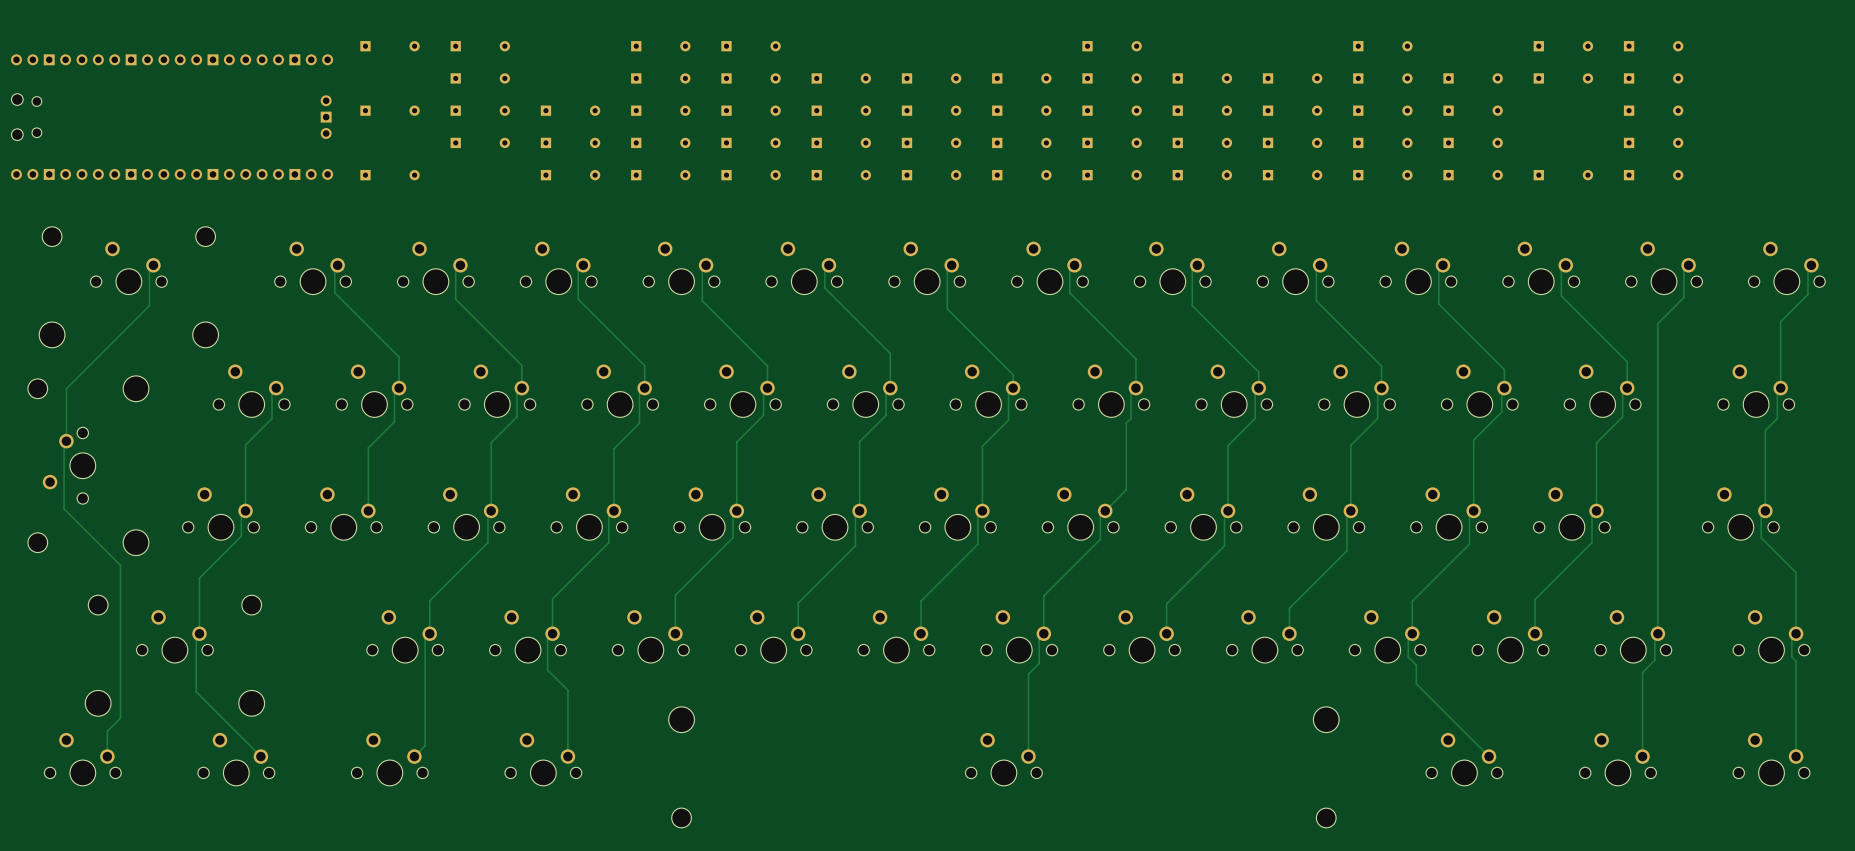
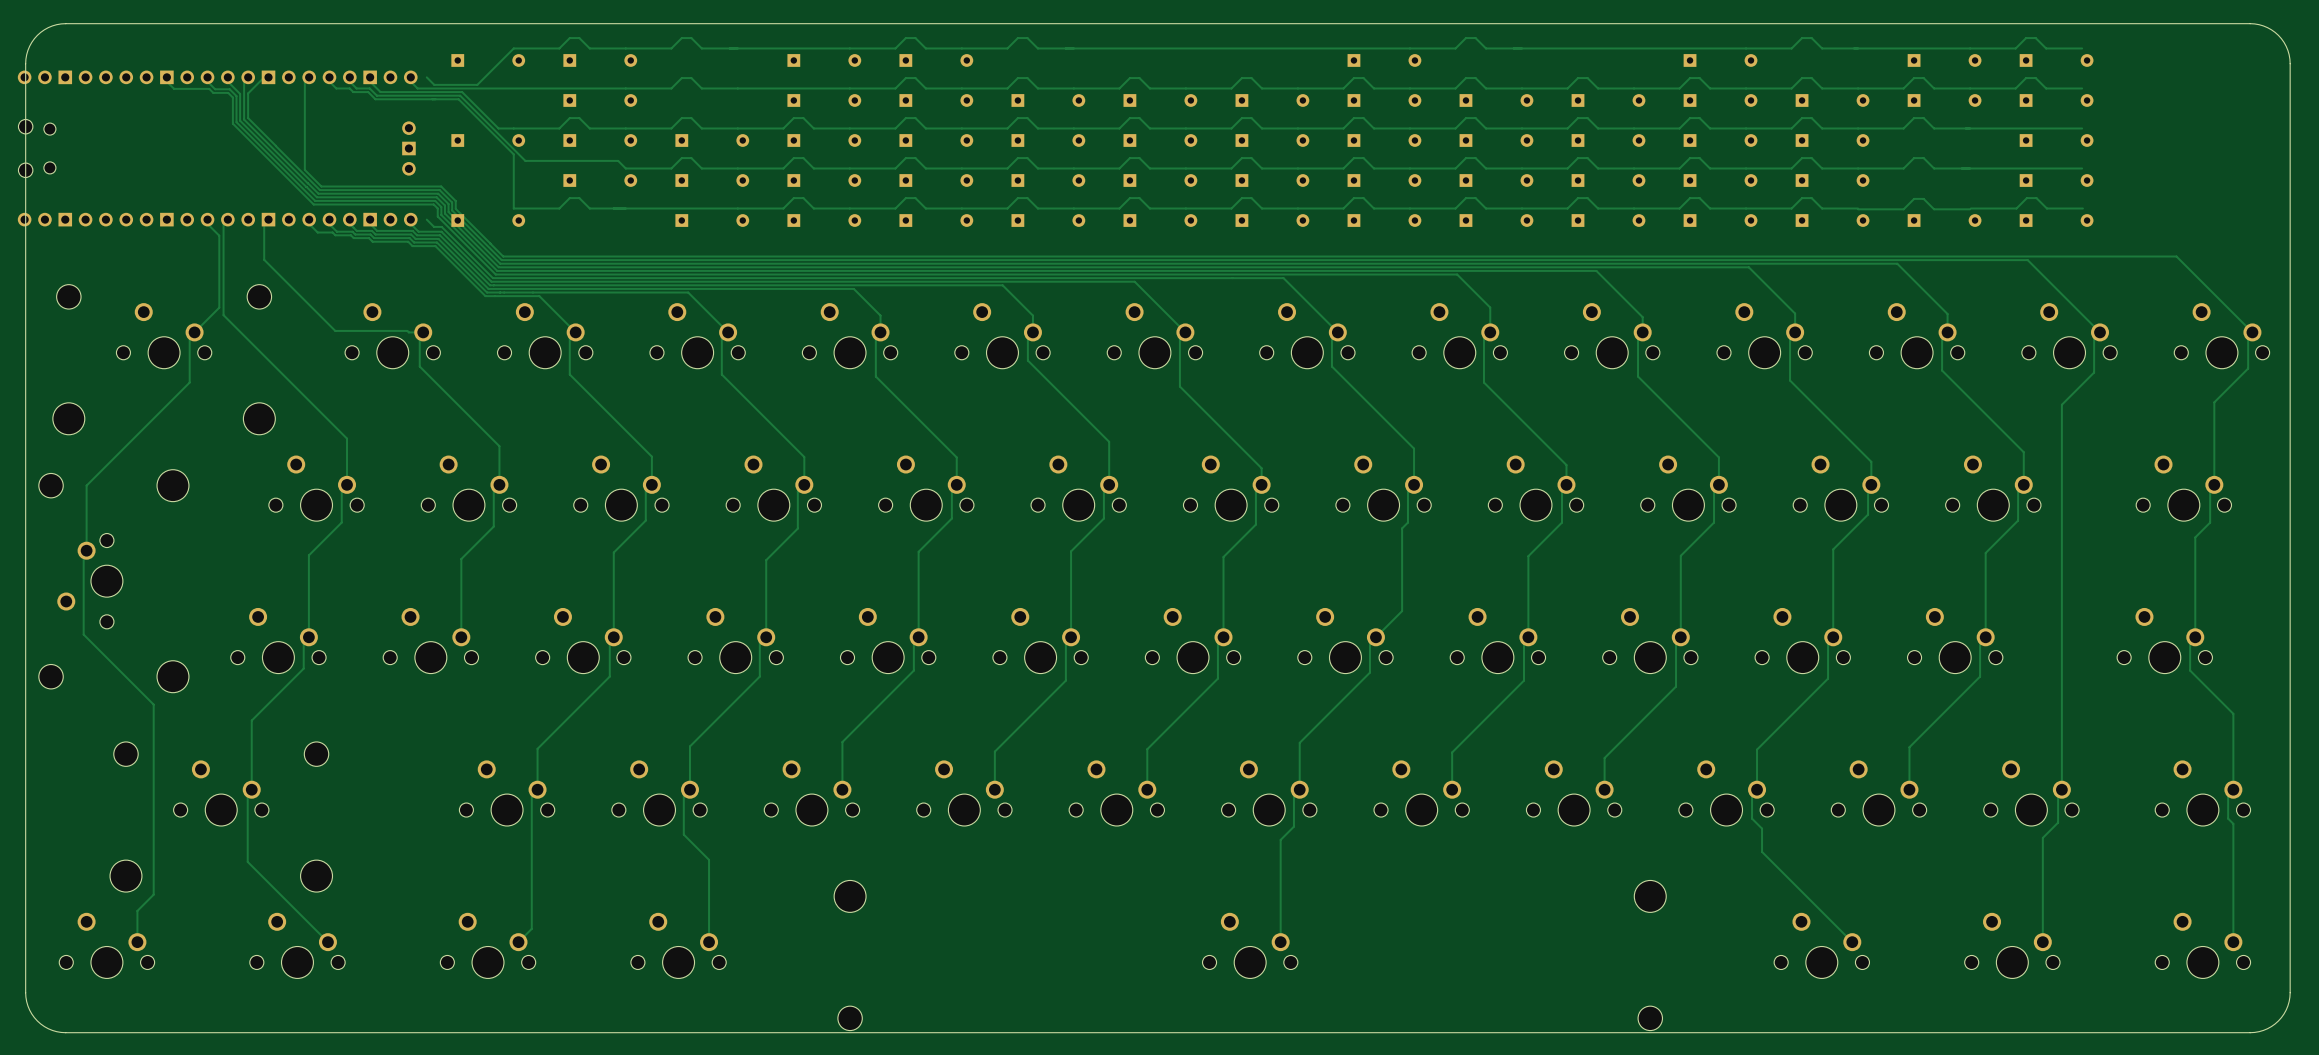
board edge: none -> (2250, 23) (65, 23) (48, 27) (37, 35) (31, 42) (26, 54) (25, 63) (25, 992) (29, 1010) (34, 1017) (44, 1026) (52, 1030) (65, 1032) (2250, 1032) (2267, 1028) (2278, 1020) (2284, 1013) (2289, 1001) (2290, 992) (2290, 63) (2287, 50) (2278, 35) (2263, 25) (2250, 23)
track: none -> (2082, 48) (2046, 48) (2035, 38) (2026, 38) (2015, 48) (1822, 48) (1811, 38) (1802, 38) (1791, 48) (1485, 48) (1475, 38) (1465, 38) (1455, 48) (1037, 48) (1027, 38) (1017, 38) (1007, 48) (925, 48) (915, 38) (905, 38) (895, 48) (701, 48) (691, 38) (681, 38) (671, 48) (589, 48) (579, 38) (569, 38) (559, 48) (513, 48) (477, 84) (434, 84) (426, 77)
track: none -> (162, 77) (174, 88) (209, 88) (213, 92) (228, 92) (232, 97) (232, 123) (313, 204) (433, 204) (437, 208) (437, 216) (495, 274) (1457, 274) (1490, 307) (1490, 332)
track: none -> (203, 77) (215, 89) (229, 89) (236, 96) (236, 122) (315, 200) (435, 200) (441, 207) (441, 215) (497, 270) (1596, 270) (1642, 317) (1642, 332)
track: none -> (223, 77) (240, 93) (240, 120) (316, 197) (436, 197) (444, 205) (444, 213) (498, 267) (1748, 267) (1795, 313) (1795, 332)
track: none -> (243, 77) (244, 119) (318, 193) (438, 193) (448, 204) (448, 212) (500, 263) (1897, 263) (1947, 314) (1947, 332)
track: none -> (264, 77) (248, 93) (248, 118) (319, 190) (439, 190) (452, 202) (452, 210) (501, 260) (2027, 260) (2100, 332)
track: none -> (304, 77) (304, 169) (321, 186) (441, 186) (455, 201) (455, 208) (490, 243)
track: none -> (325, 77) (336, 88) (349, 88) (353, 92) (368, 92) (375, 99) (458, 99) (513, 154) (513, 208) (559, 208) (569, 198) (579, 198) (589, 208) (783, 208) (793, 198) (803, 198) (813, 208) (895, 208) (905, 198) (915, 198) (925, 208) (1007, 208) (1017, 198) (1027, 198) (1037, 208) (1119, 208) (1129, 198) (1139, 198) (1149, 208) (1231, 208) (1241, 198) (1251, 198) (1261, 208) (1343, 208) (1353, 198) (1363, 198) (1373, 208) (1455, 208) (1465, 198) (1475, 198) (1485, 208) (1567, 208) (1578, 198) (1587, 198) (1598, 208) (1679, 208) (1690, 198) (1699, 198) (1710, 208) (1791, 208) (1802, 198) (1811, 198) (1822, 208) (1858, 208)
track: none -> (345, 77) (356, 88) (369, 88) (376, 95) (460, 95) (525, 160) (618, 160) (625, 168) (671, 168) (681, 158) (691, 158) (701, 168) (783, 168) (793, 158) (803, 158) (813, 168) (895, 168) (905, 158) (915, 158) (925, 168) (1007, 168) (1017, 158) (1027, 158) (1037, 168) (1119, 168) (1129, 158) (1139, 158) (1149, 168) (1231, 168) (1241, 158) (1251, 158) (1261, 168) (1343, 168) (1353, 158) (1363, 158) (1373, 168) (1455, 168) (1465, 158) (1475, 158) (1485, 168) (1567, 168) (1578, 158) (1587, 158) (1598, 168) (1679, 168) (1690, 158) (1699, 158) (1710, 168) (1791, 168) (1802, 158) (1811, 158) (1822, 168) (1903, 168) (1914, 158) (1923, 158) (1934, 168) (2082, 168)
track: none -> (365, 77) (380, 92) (462, 92) (498, 128) (559, 128) (569, 118) (579, 118) (589, 128) (671, 128) (681, 118) (691, 118) (701, 128) (783, 128) (793, 118) (803, 118) (813, 128) (895, 128) (905, 118) (915, 118) (925, 128) (1007, 128) (1017, 118) (1027, 118) (1037, 128) (1119, 128) (1129, 118) (1139, 118) (1149, 128) (1231, 128) (1241, 118) (1251, 118) (1261, 128) (1343, 128) (1353, 118) (1363, 118) (1373, 128) (1455, 128) (1465, 118) (1475, 118) (1485, 128) (1567, 128) (1578, 118) (1587, 118) (1598, 128) (1679, 128) (1690, 118) (1699, 118) (1710, 128) (1791, 128) (1802, 118) (1811, 118) (1822, 128) (1903, 128) (1914, 118) (1923, 118) (1934, 128) (2082, 128)
track: none -> (406, 77) (417, 88) (671, 88) (681, 78) (691, 78) (701, 88) (895, 88) (905, 78) (915, 78) (925, 88) (1007, 88) (1017, 78) (1027, 78) (1037, 88) (1119, 88) (1129, 78) (1139, 78) (1149, 88) (1231, 88) (1241, 78) (1251, 78) (1261, 88) (1343, 88) (1353, 78) (1363, 78) (1373, 88) (1455, 88) (1465, 78) (1475, 78) (1485, 88) (1567, 88) (1578, 78) (1587, 78) (1598, 88) (1679, 88) (1690, 78) (1699, 78) (1710, 88) (1791, 88) (1802, 78) (1811, 78) (1822, 88) (1903, 88) (1914, 78) (1923, 78) (1934, 88) (2015, 88) (2026, 78) (2035, 78) (2046, 88) (2082, 88)
track: none -> (2082, 208) (2046, 208) (2036, 198) (2026, 198) (2016, 208) (1970, 208)
track: none -> (1970, 209) (1934, 209) (1923, 198) (1914, 198) (1903, 209) (1858, 209)
track: none -> (203, 219) (219, 235) (219, 307) (194, 332)
track: none -> (223, 219) (223, 315) (347, 438) (347, 484)
track: none -> (264, 219) (264, 259) (335, 330) (423, 332)
track: none -> (304, 219) (317, 232) (350, 235) (353, 238) (369, 238) (372, 241) (408, 241) (412, 246) (435, 246) (485, 296) (539, 296) (575, 332)
track: none -> (325, 219) (336, 231) (370, 234) (374, 238) (409, 238) (414, 242) (436, 242) (487, 292) (688, 292) (728, 332)
track: none -> (345, 219) (356, 230) (372, 230) (375, 234) (411, 234) (415, 238) (438, 238) (488, 288) (853, 288) (880, 315) (880, 332)
track: none -> (365, 219) (377, 230) (412, 230) (417, 235) (439, 235) (489, 285) (1002, 285) (1032, 315) (1032, 332)
track: none -> (406, 219) (418, 231) (441, 231) (491, 281) (1134, 281) (1185, 332)
track: none -> (426, 219) (434, 226) (441, 226) (492, 278) (1283, 278) (1337, 332)
track: none -> (490, 243) (503, 256) (2176, 256) (2252, 332)

